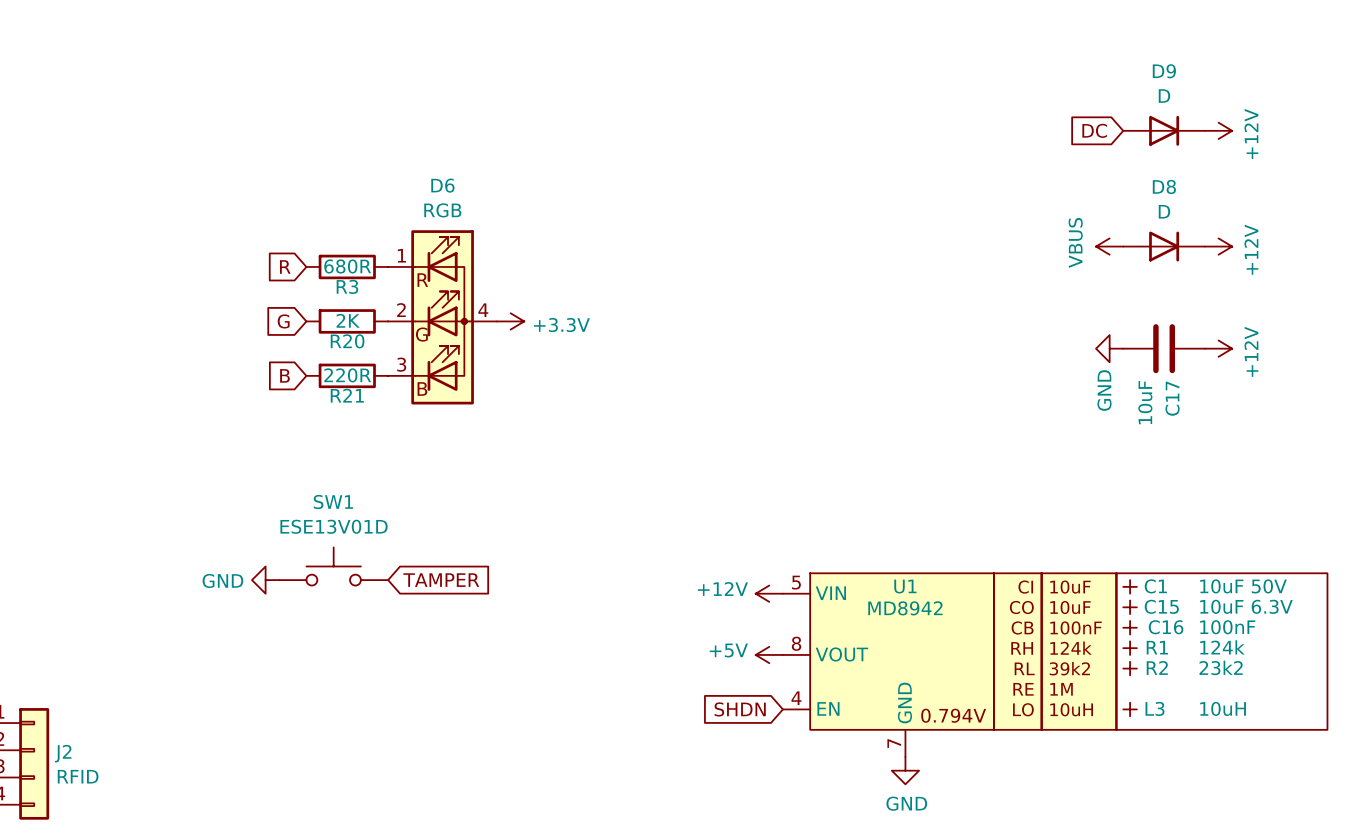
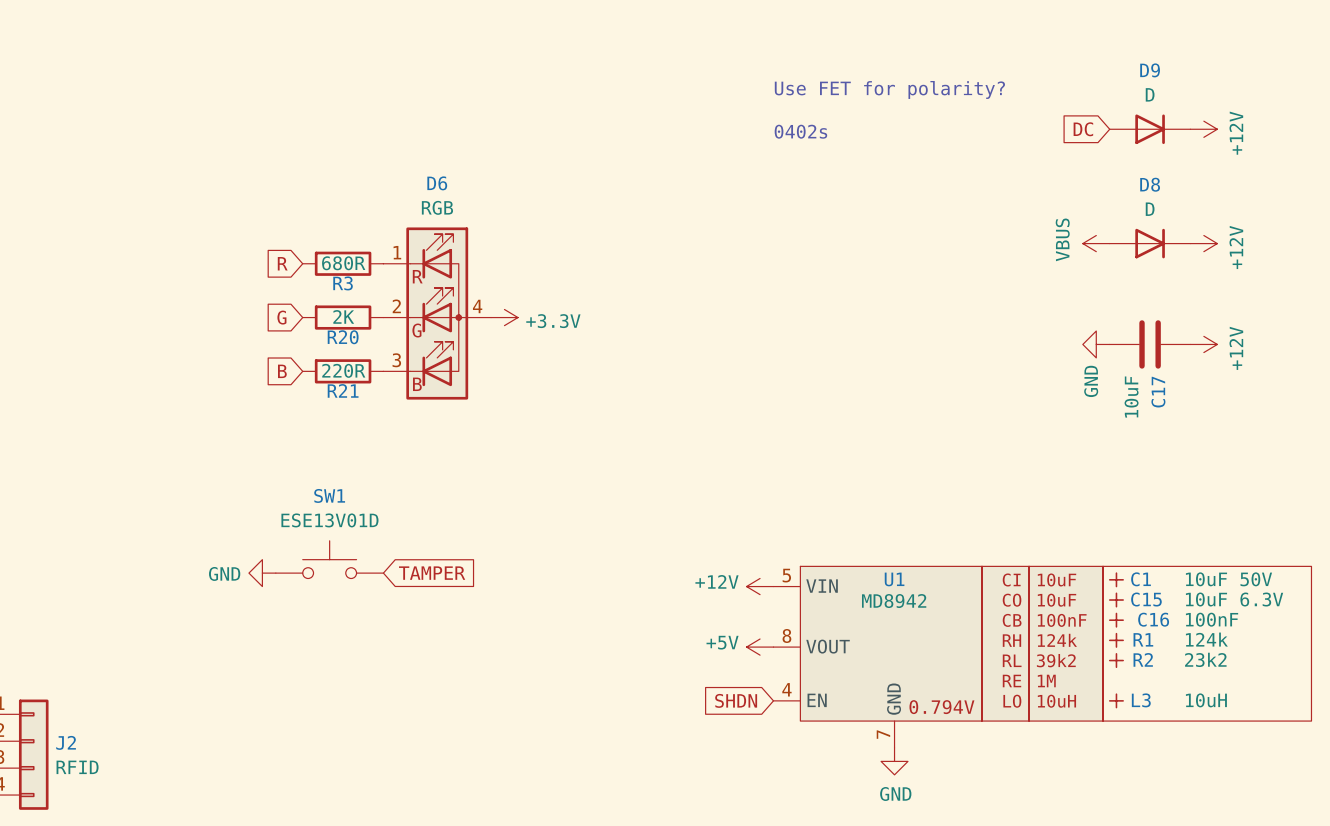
text: none -> Use FET for polarity? (889, 89)
text: none -> 0402s (800, 131)

